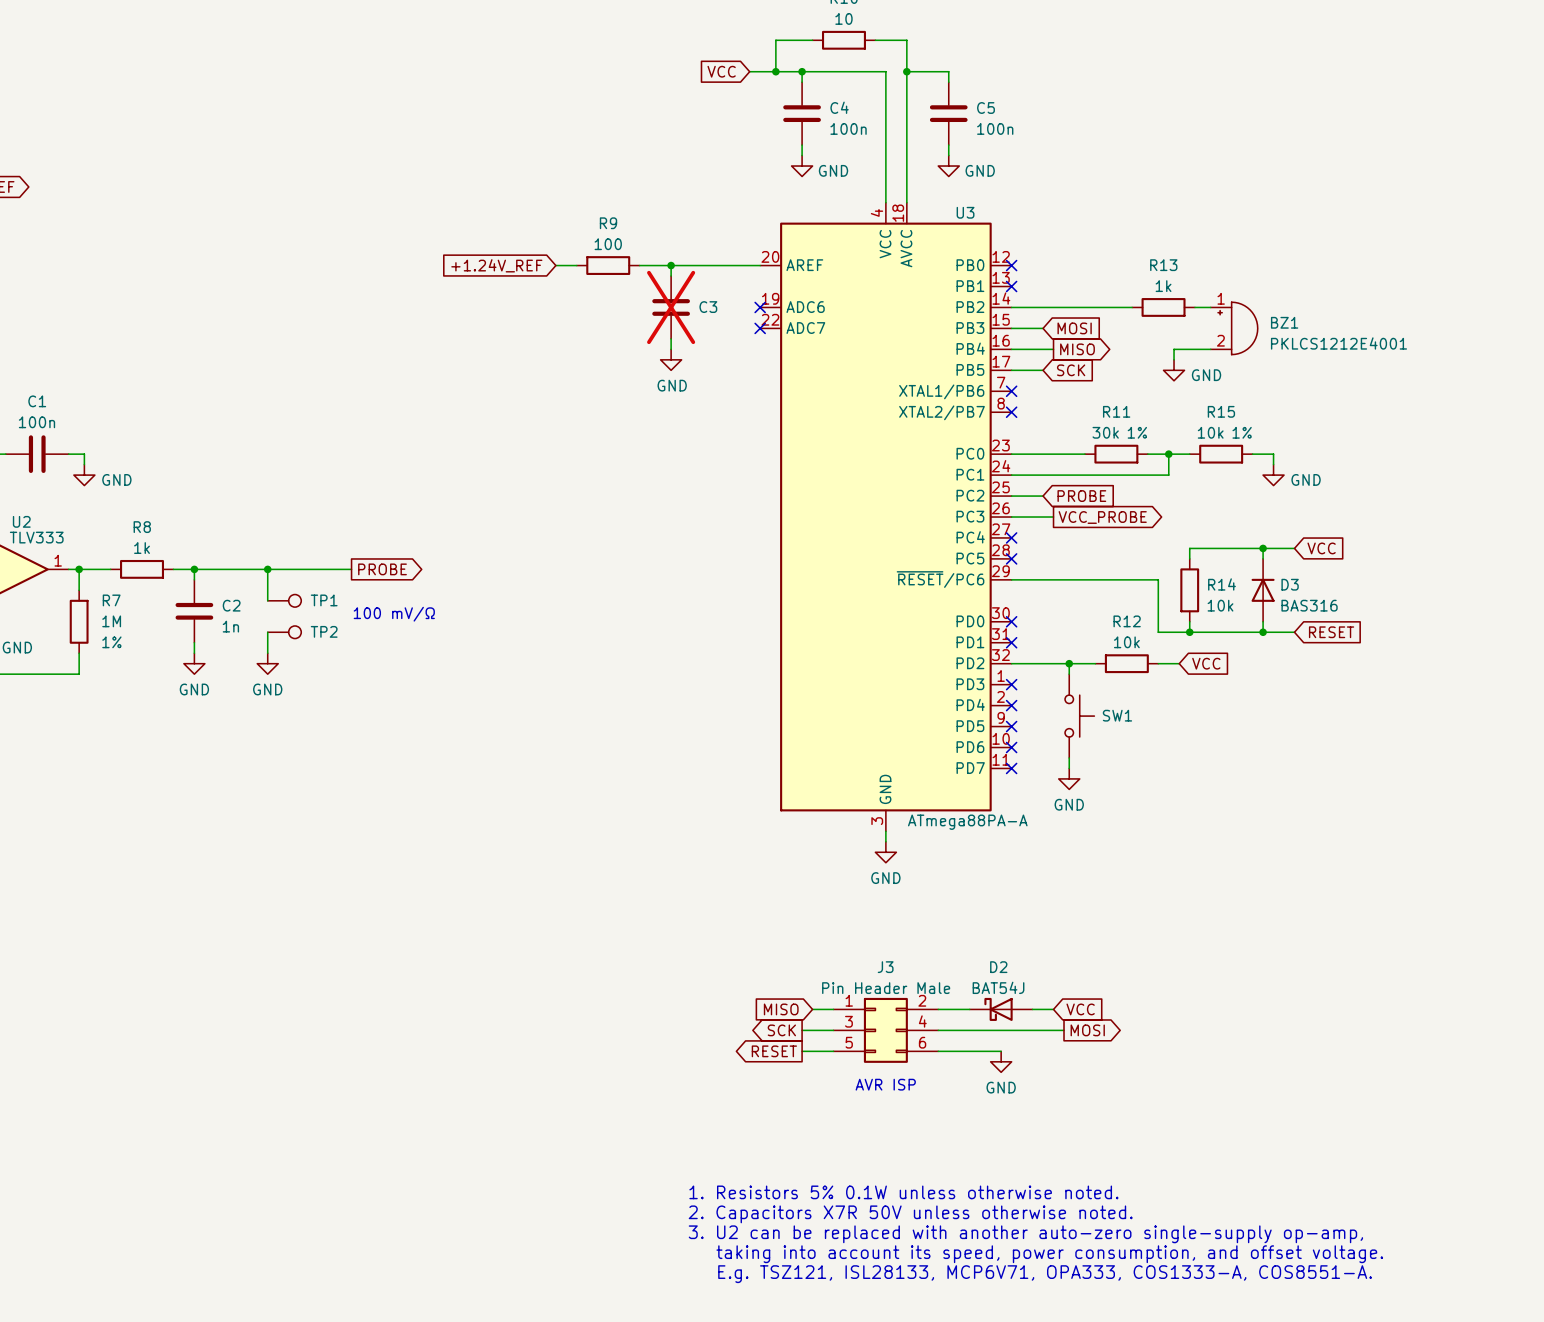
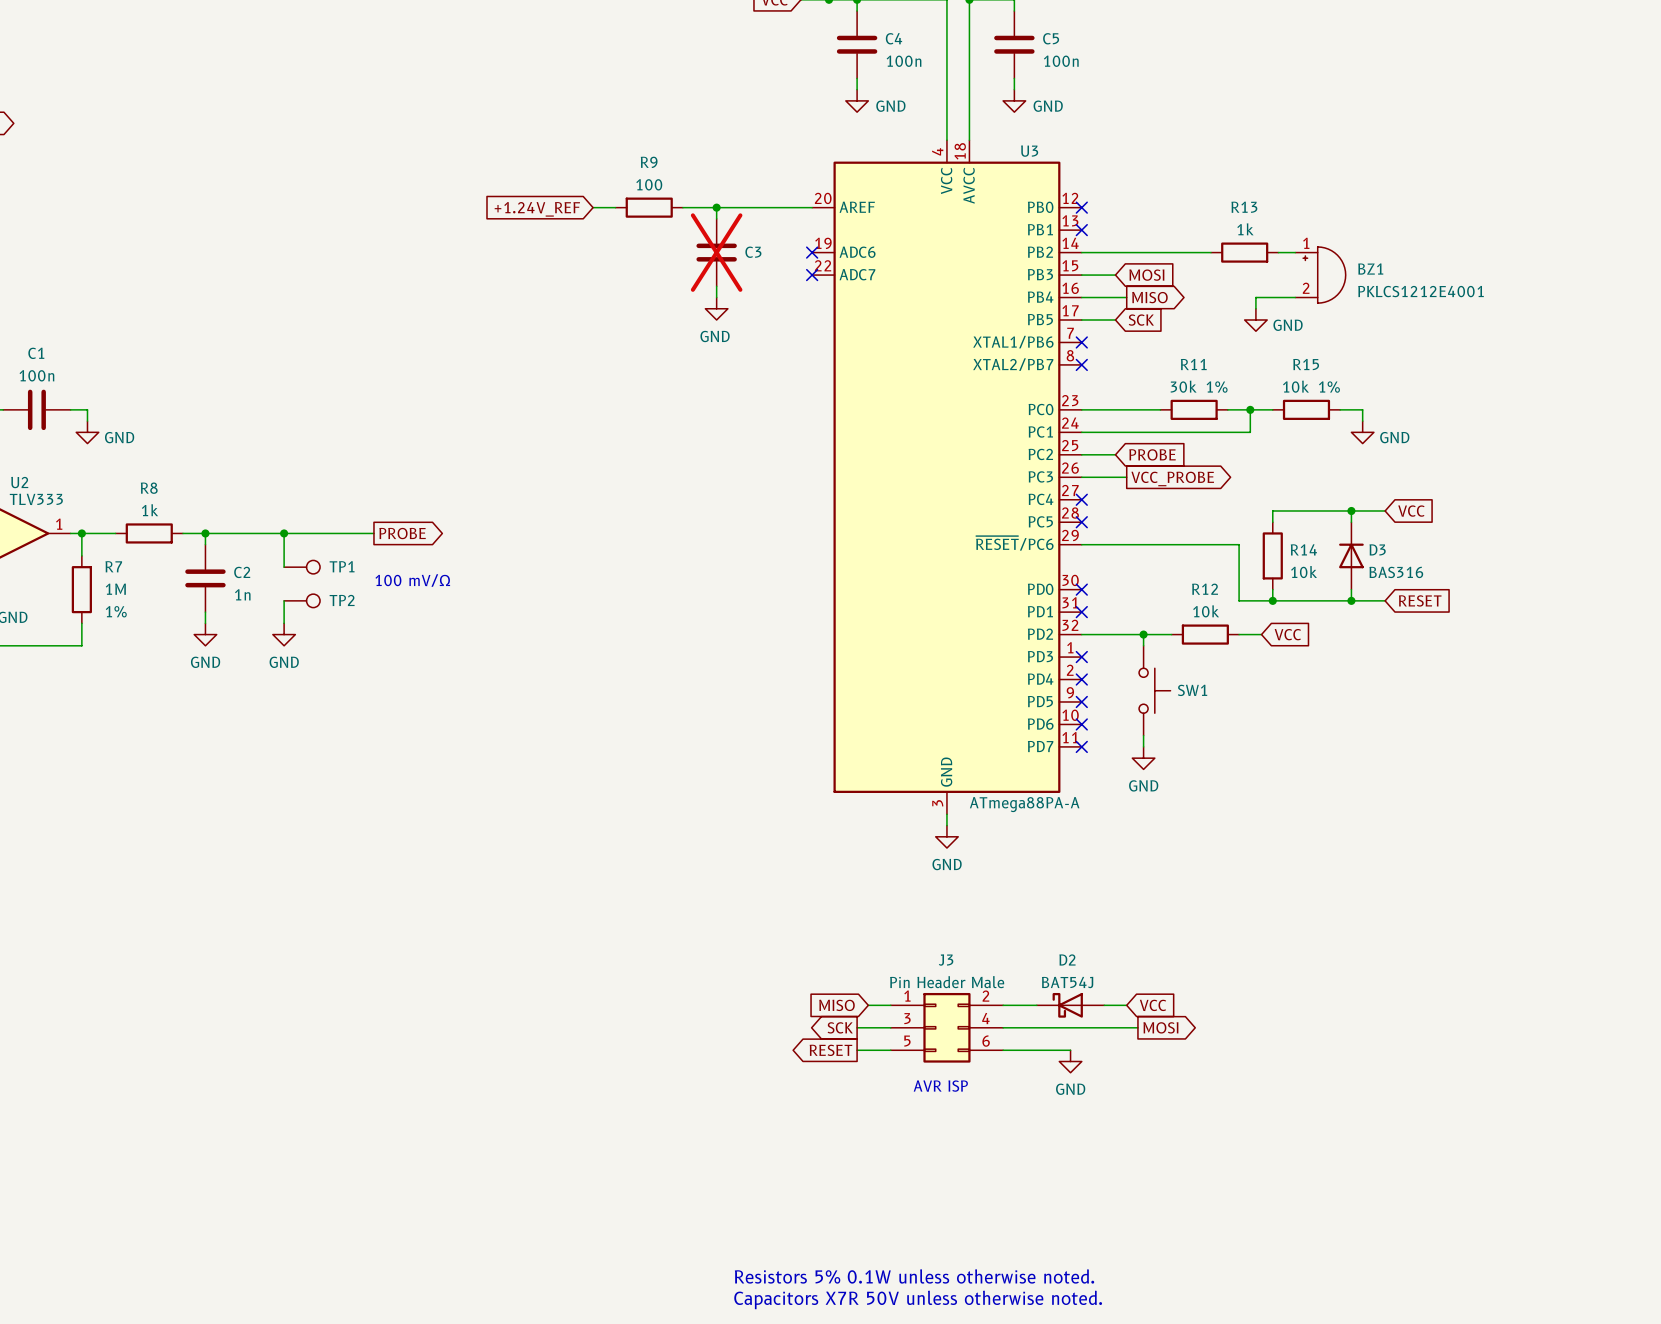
text: 1. Resistors 5% 0.1W unless otherwise noted. (903, 1192) -> none
text: 2. Capacitors X7R 50V unless otherwise noted. (910, 1214) -> none
text: 3. U2 can be replaced with another auto-zero single-supply op-amp, (1025, 1234) -> none
text: taking into account its speed, power consumption, and offset voltage. (1049, 1254) -> none
text: none -> Resistors 5% 0.1W unless otherwise noted. (914, 1276)
text: E.g. TSZ121, ISL28133, MCP6V71, OPA333, COS1333-A, COS8551-A. (1045, 1274) -> none
text: none -> Capacitors X7R 50V unless otherwise noted. (918, 1299)

